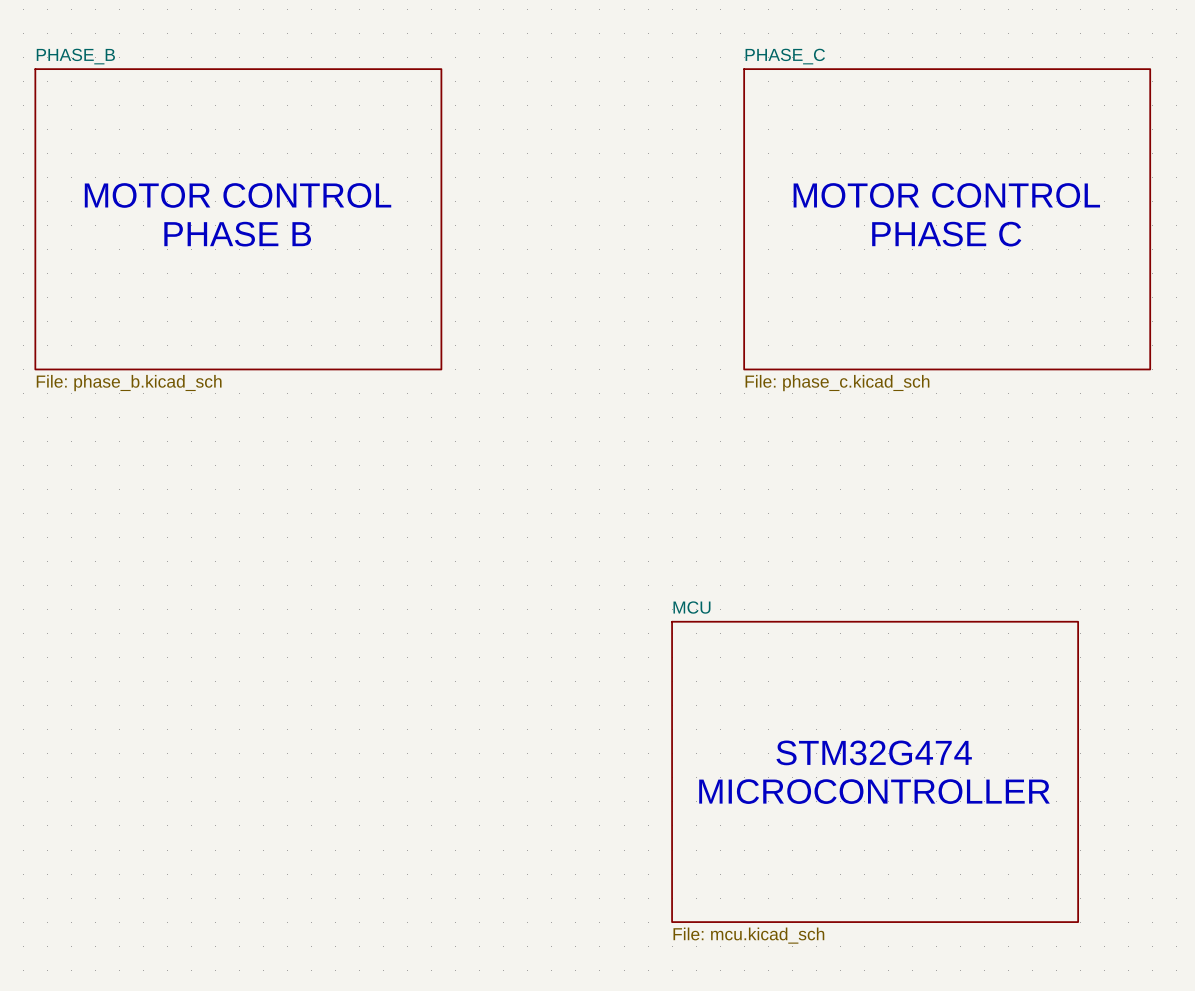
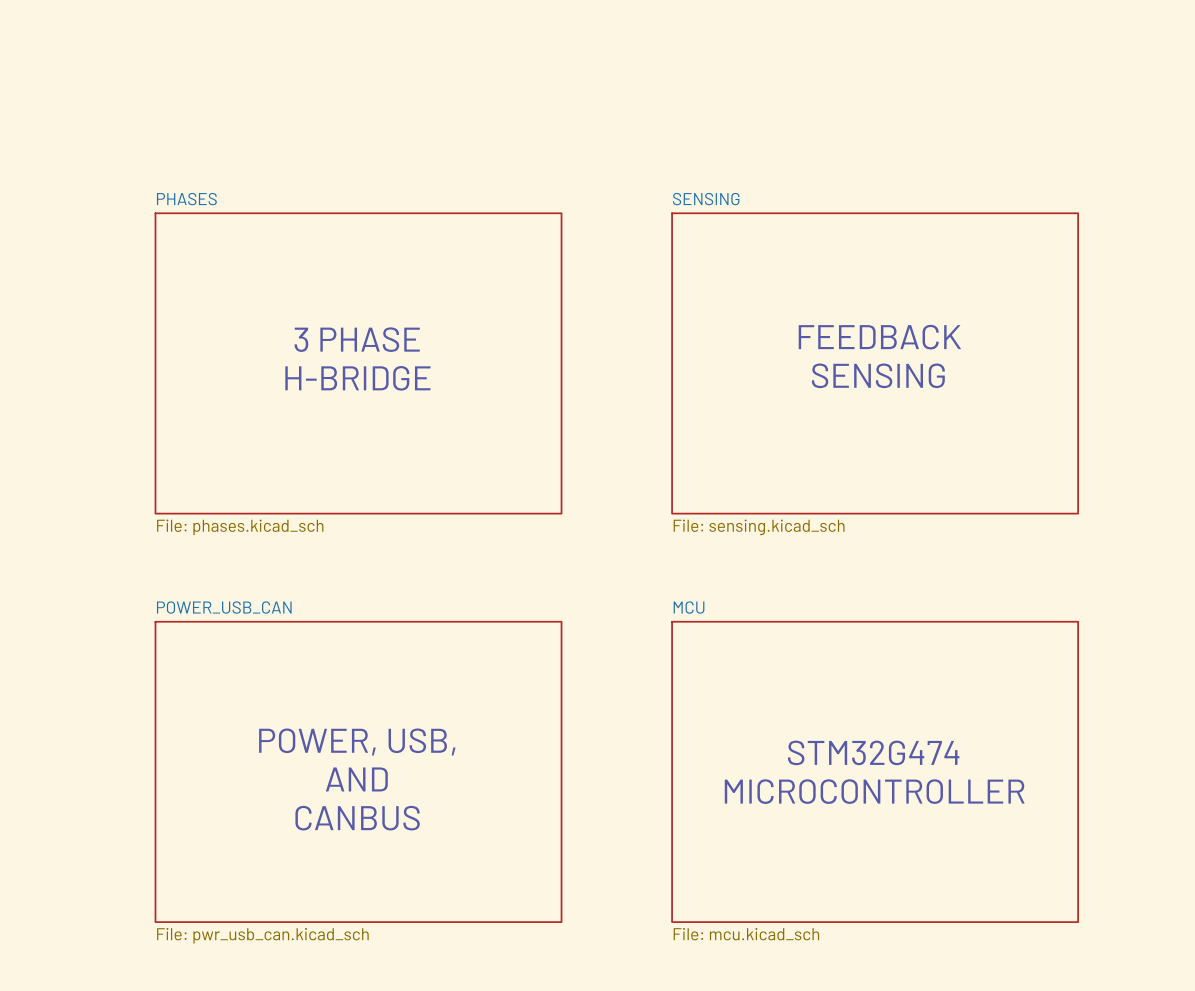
text: MOTOR CONTROL (238, 195) -> none
text: MOTOR CONTROL (946, 195) -> none
sheet PHASE_B: File: phase_b.kicad_sch (238, 219) -> none
sheet PHASE_C: File: phase_c.kicad_sch (947, 219) -> none
text: PHASE B (237, 234) -> none
text: PHASE C (946, 234) -> none
text: none -> FEEDBACK (879, 337)
text: none -> 3 PHASE (357, 339)
sheet PHASES: none -> File: phases.kicad_sch (358, 363)
sheet SENSING: none -> File: sensing.kicad_sch (875, 363)
text: none -> SENSING (878, 375)
text: none -> H-BRIDGE (357, 378)
text: none -> POWER, USB, (357, 742)
sheet POWER_USB_CAN: none -> File: pwr_usb_can.kicad_sch (358, 771)
text: none -> AND (356, 779)
text: none -> CANBUS (357, 818)

